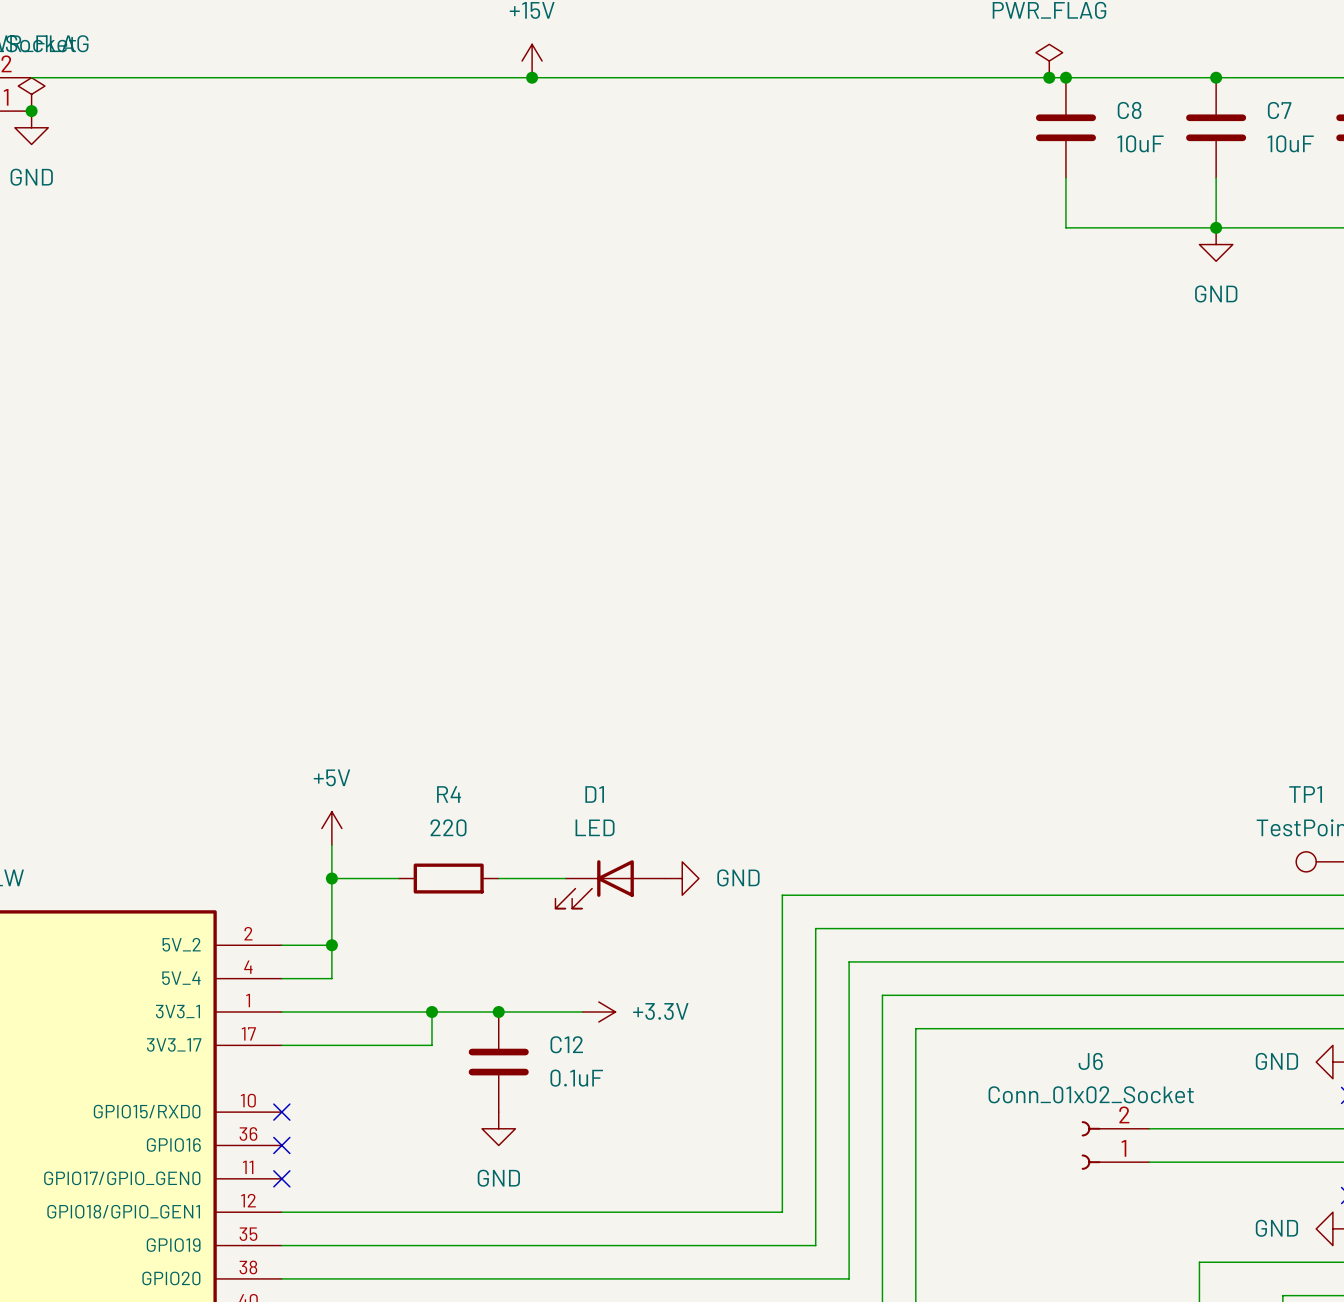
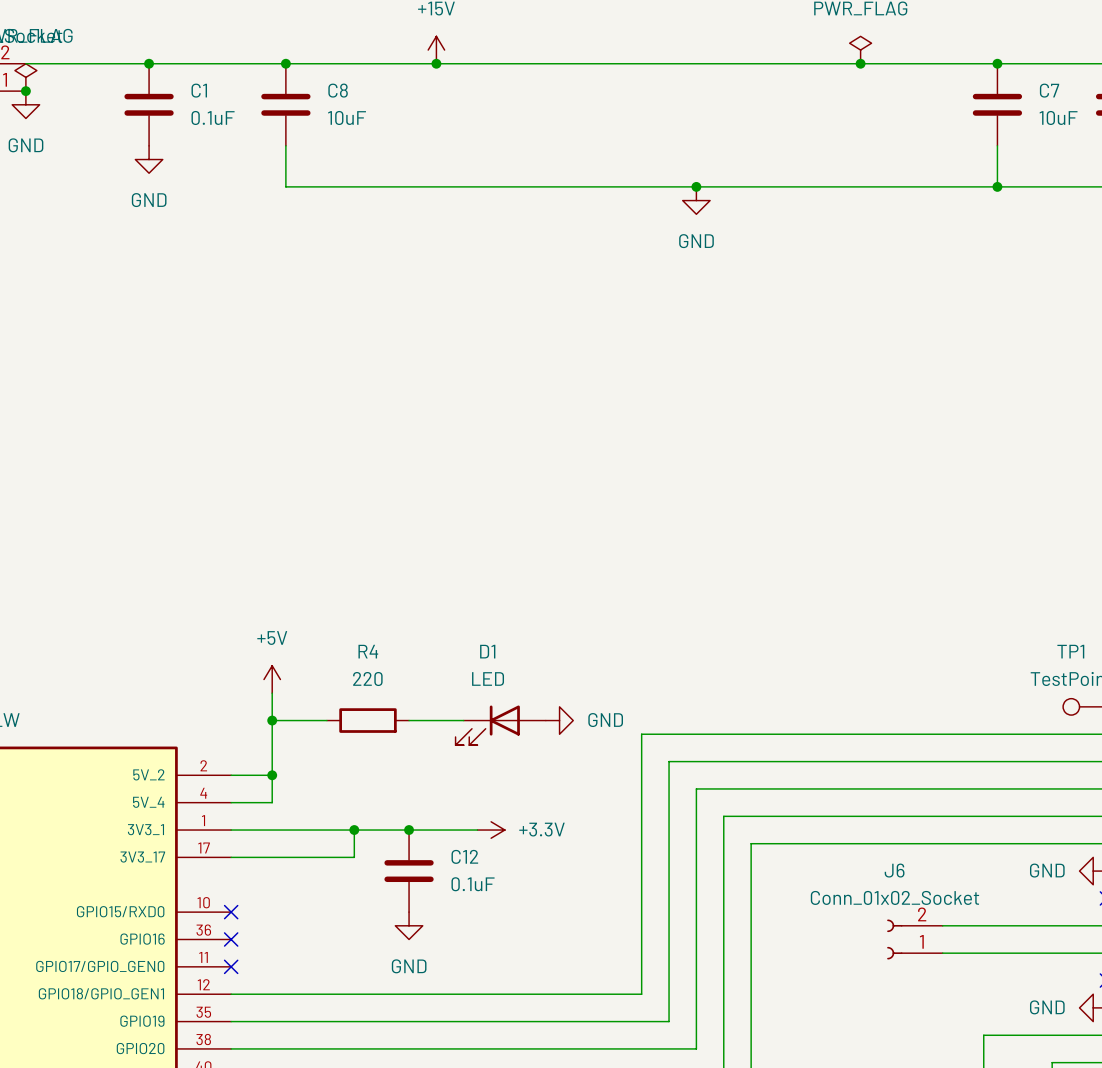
junction: none -> (149, 63)
junction: none -> (285, 63)
junction: (1065, 77) -> none
C1: none -> 0.1uF (149, 104)
C8 position: (1065, 127) -> (285, 104)
wire: (1065, 177) (1065, 227) -> (285, 145) (285, 186) (874, 186)
power symbol: none -> GND (149, 159)
junction: none -> (696, 186)
power symbol: none -> GND (696, 200)
power symbol: GND (1216, 244) -> none

